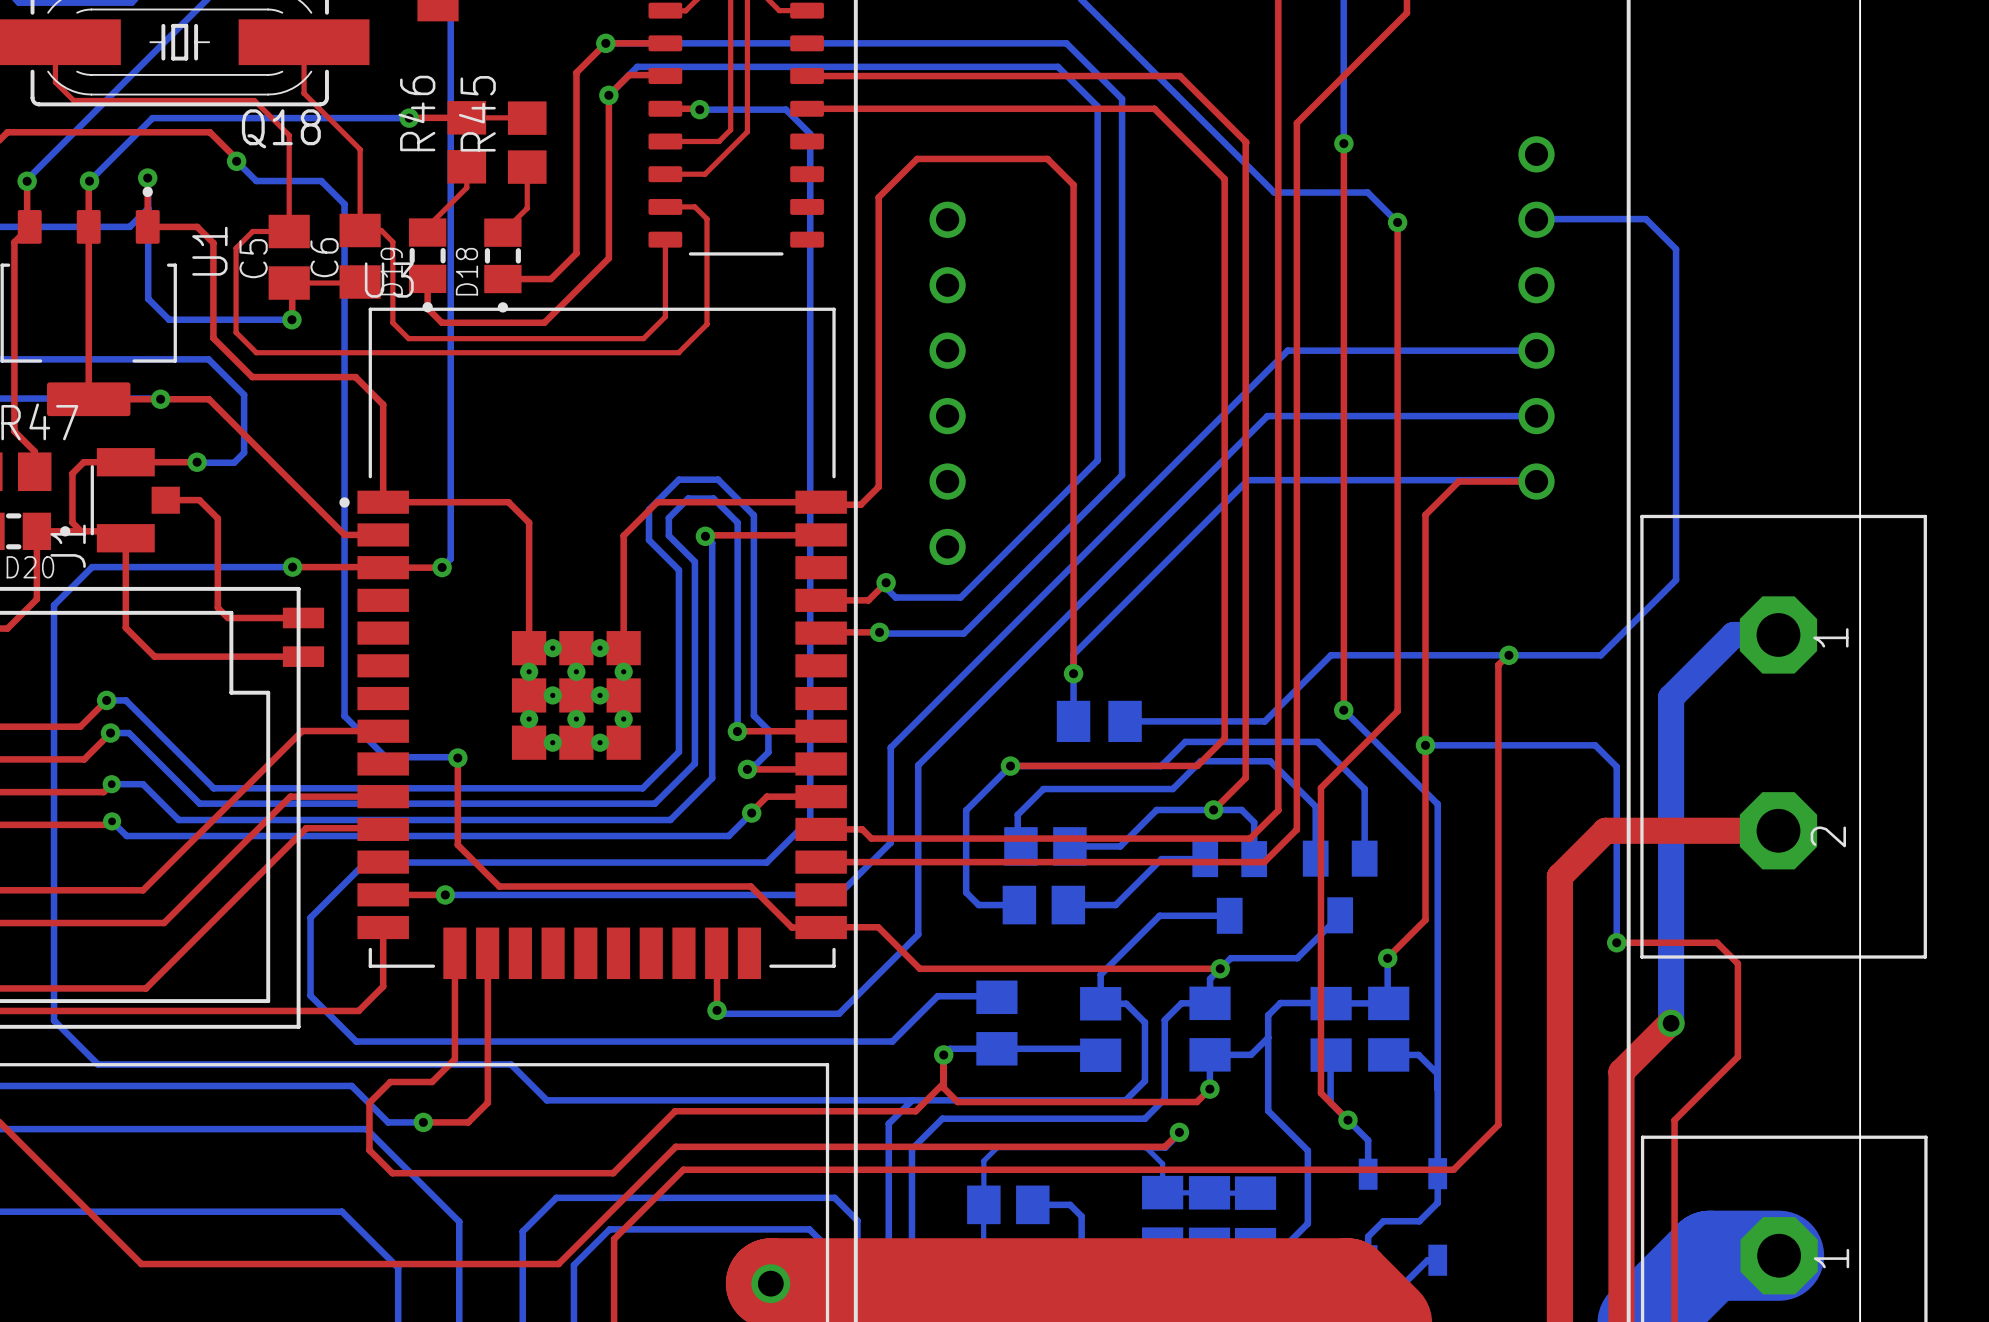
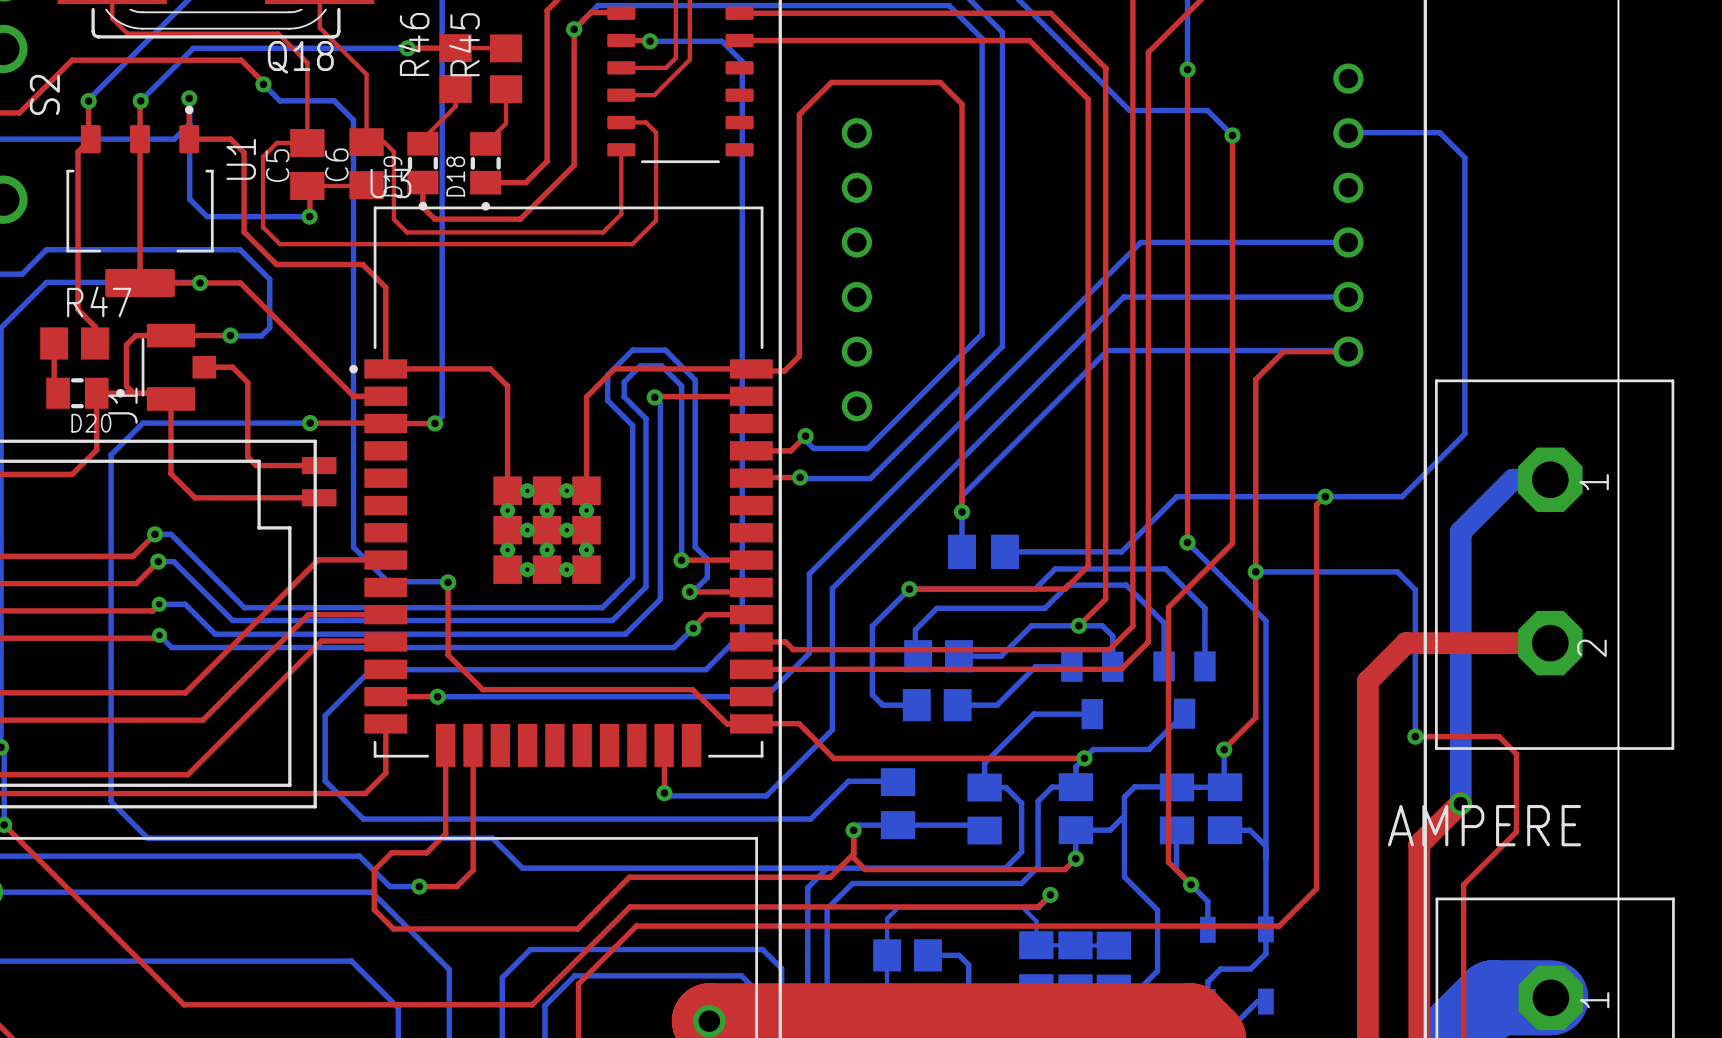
text: none -> AMPERE (1484, 825)

